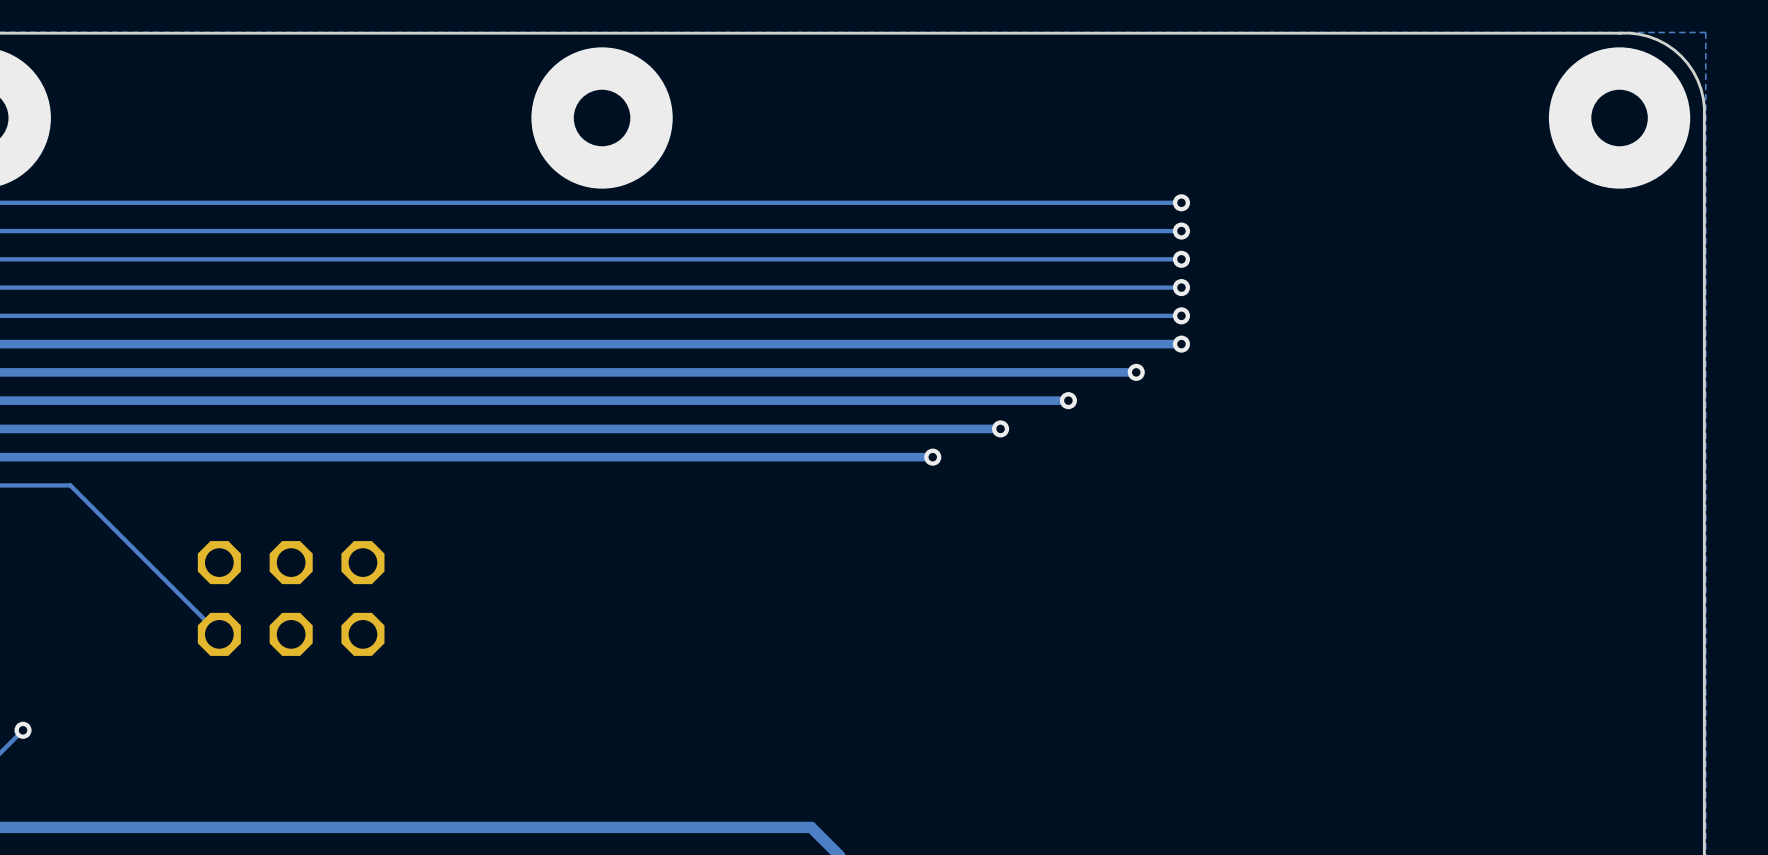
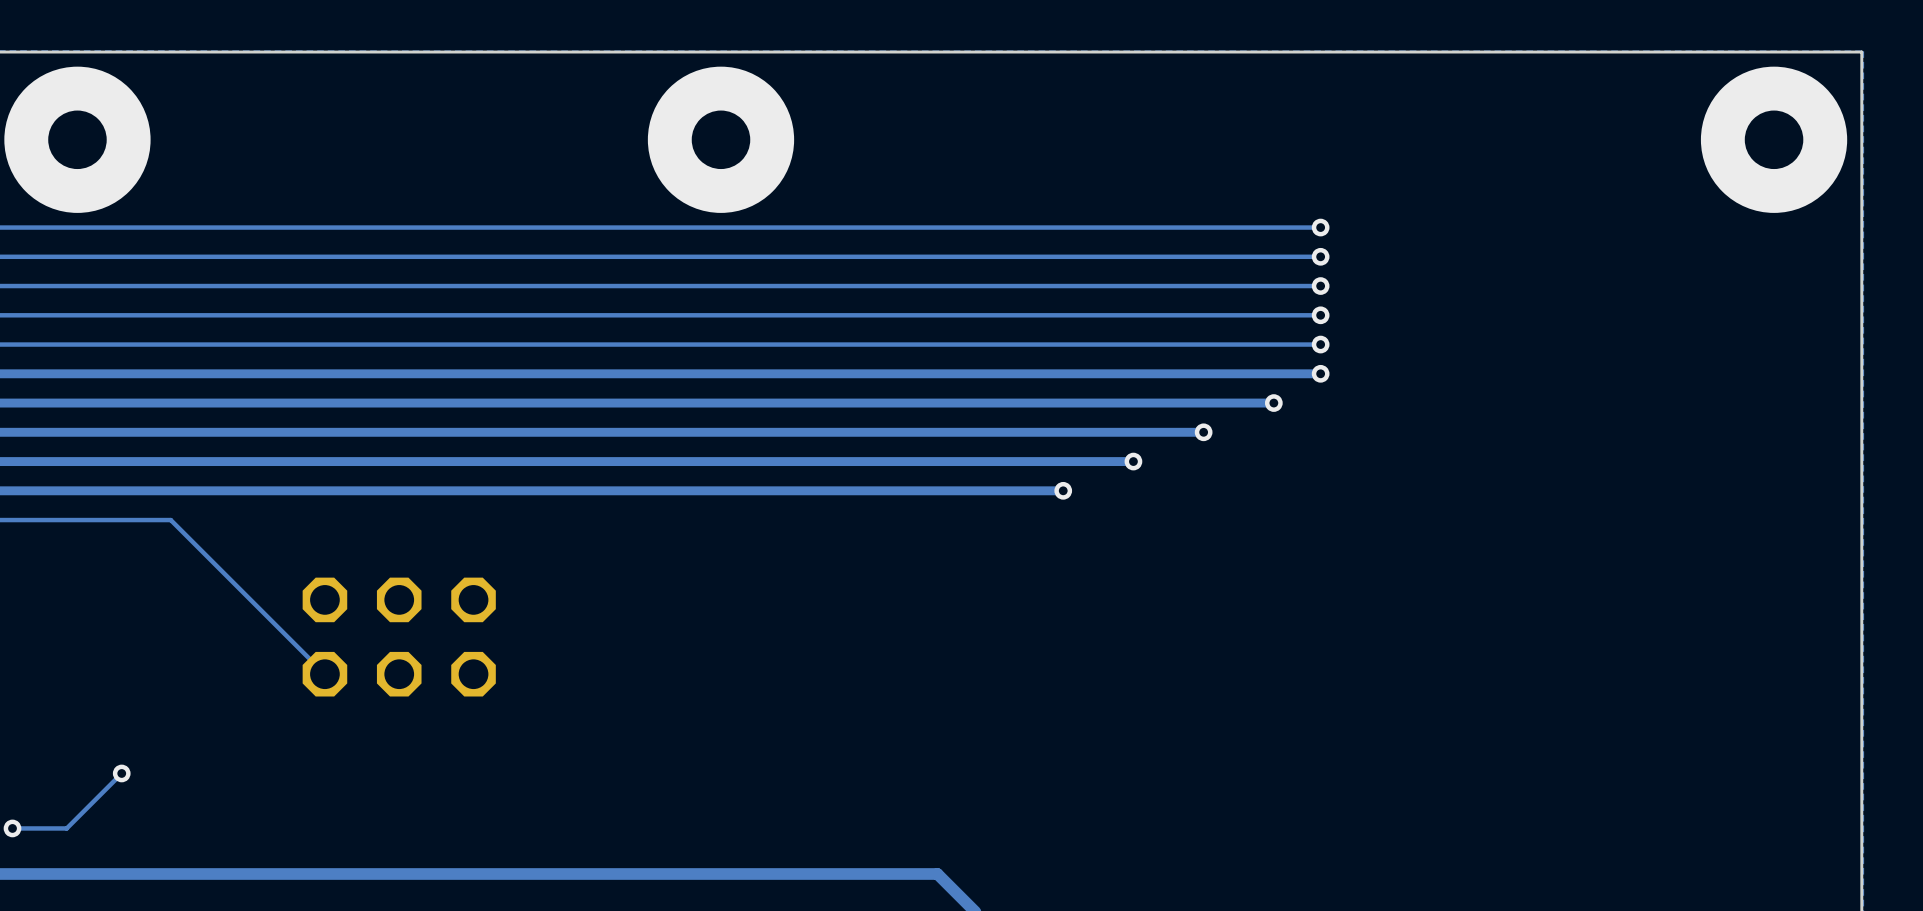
board edge: (1619, 33) (1638, 34) (1657, 39) (1681, 56) (1697, 80) (1703, 98) (1704, 118) -> (1774, 52) (1861, 52) (1861, 139)

